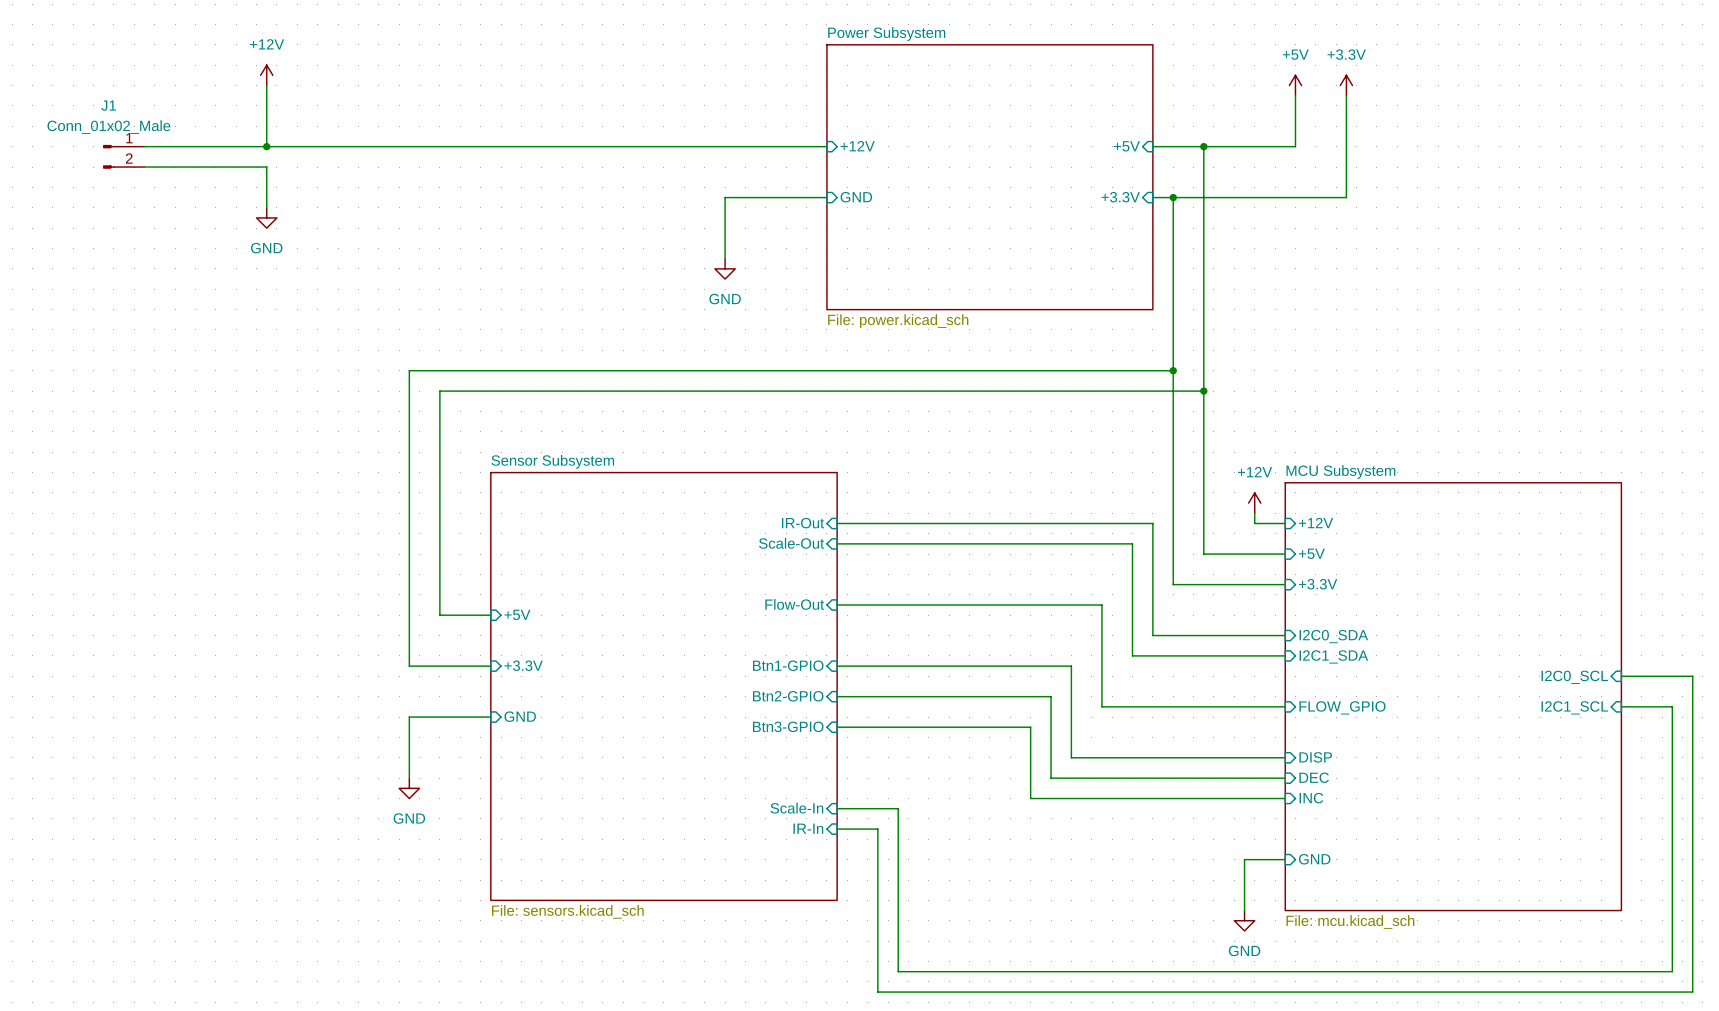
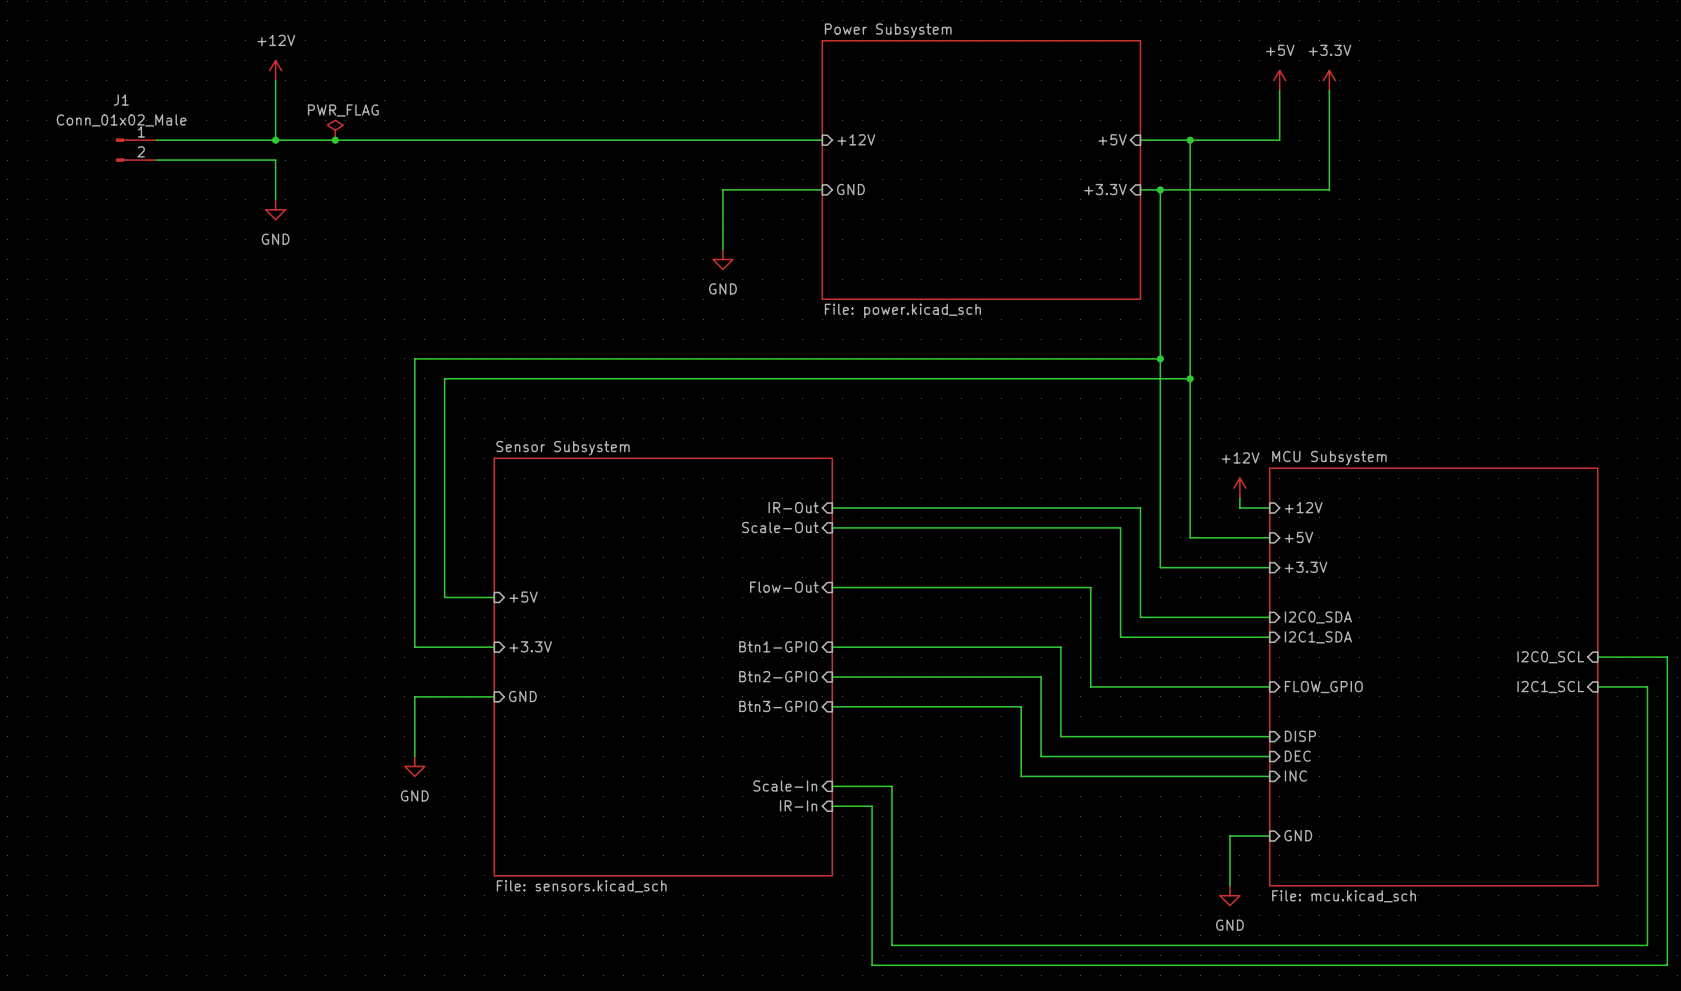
power symbol: none -> PWR_FLAG (335, 130)
junction: none -> (335, 140)

